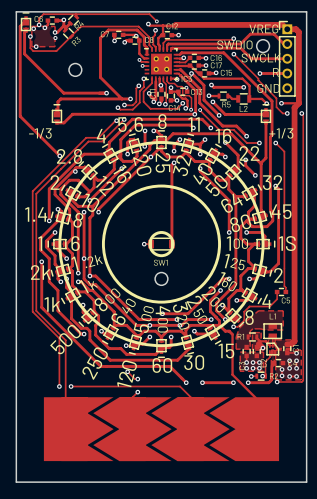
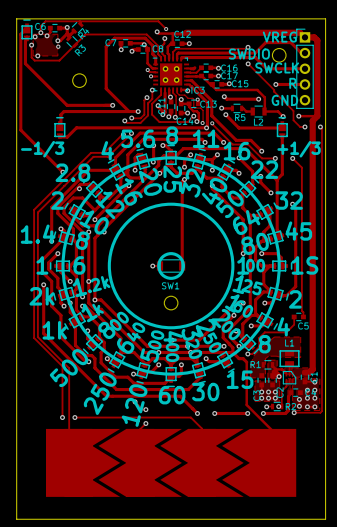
track: (175, 54) (181, 52) (223, 52) (272, 101) (270, 209) (272, 212) (272, 220) (266, 226) (252, 226) (248, 220) -> none
via: (183, 57) -> none
track: (191, 73) (203, 85) (203, 100) (219, 115) -> none
via: (191, 73) -> none
via: (219, 115) -> none

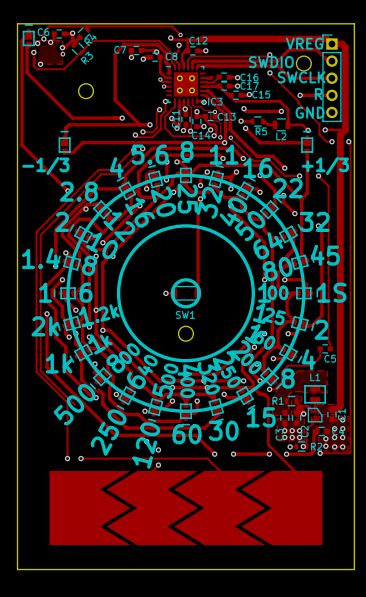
track: (69, 368) (69, 448) -> none

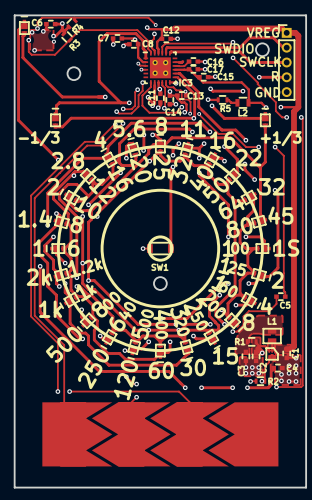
track: (253, 387) (260, 394) (264, 394) (268, 398) (268, 444) (297, 473) -> none
track: none -> (64, 345) (64, 418)

